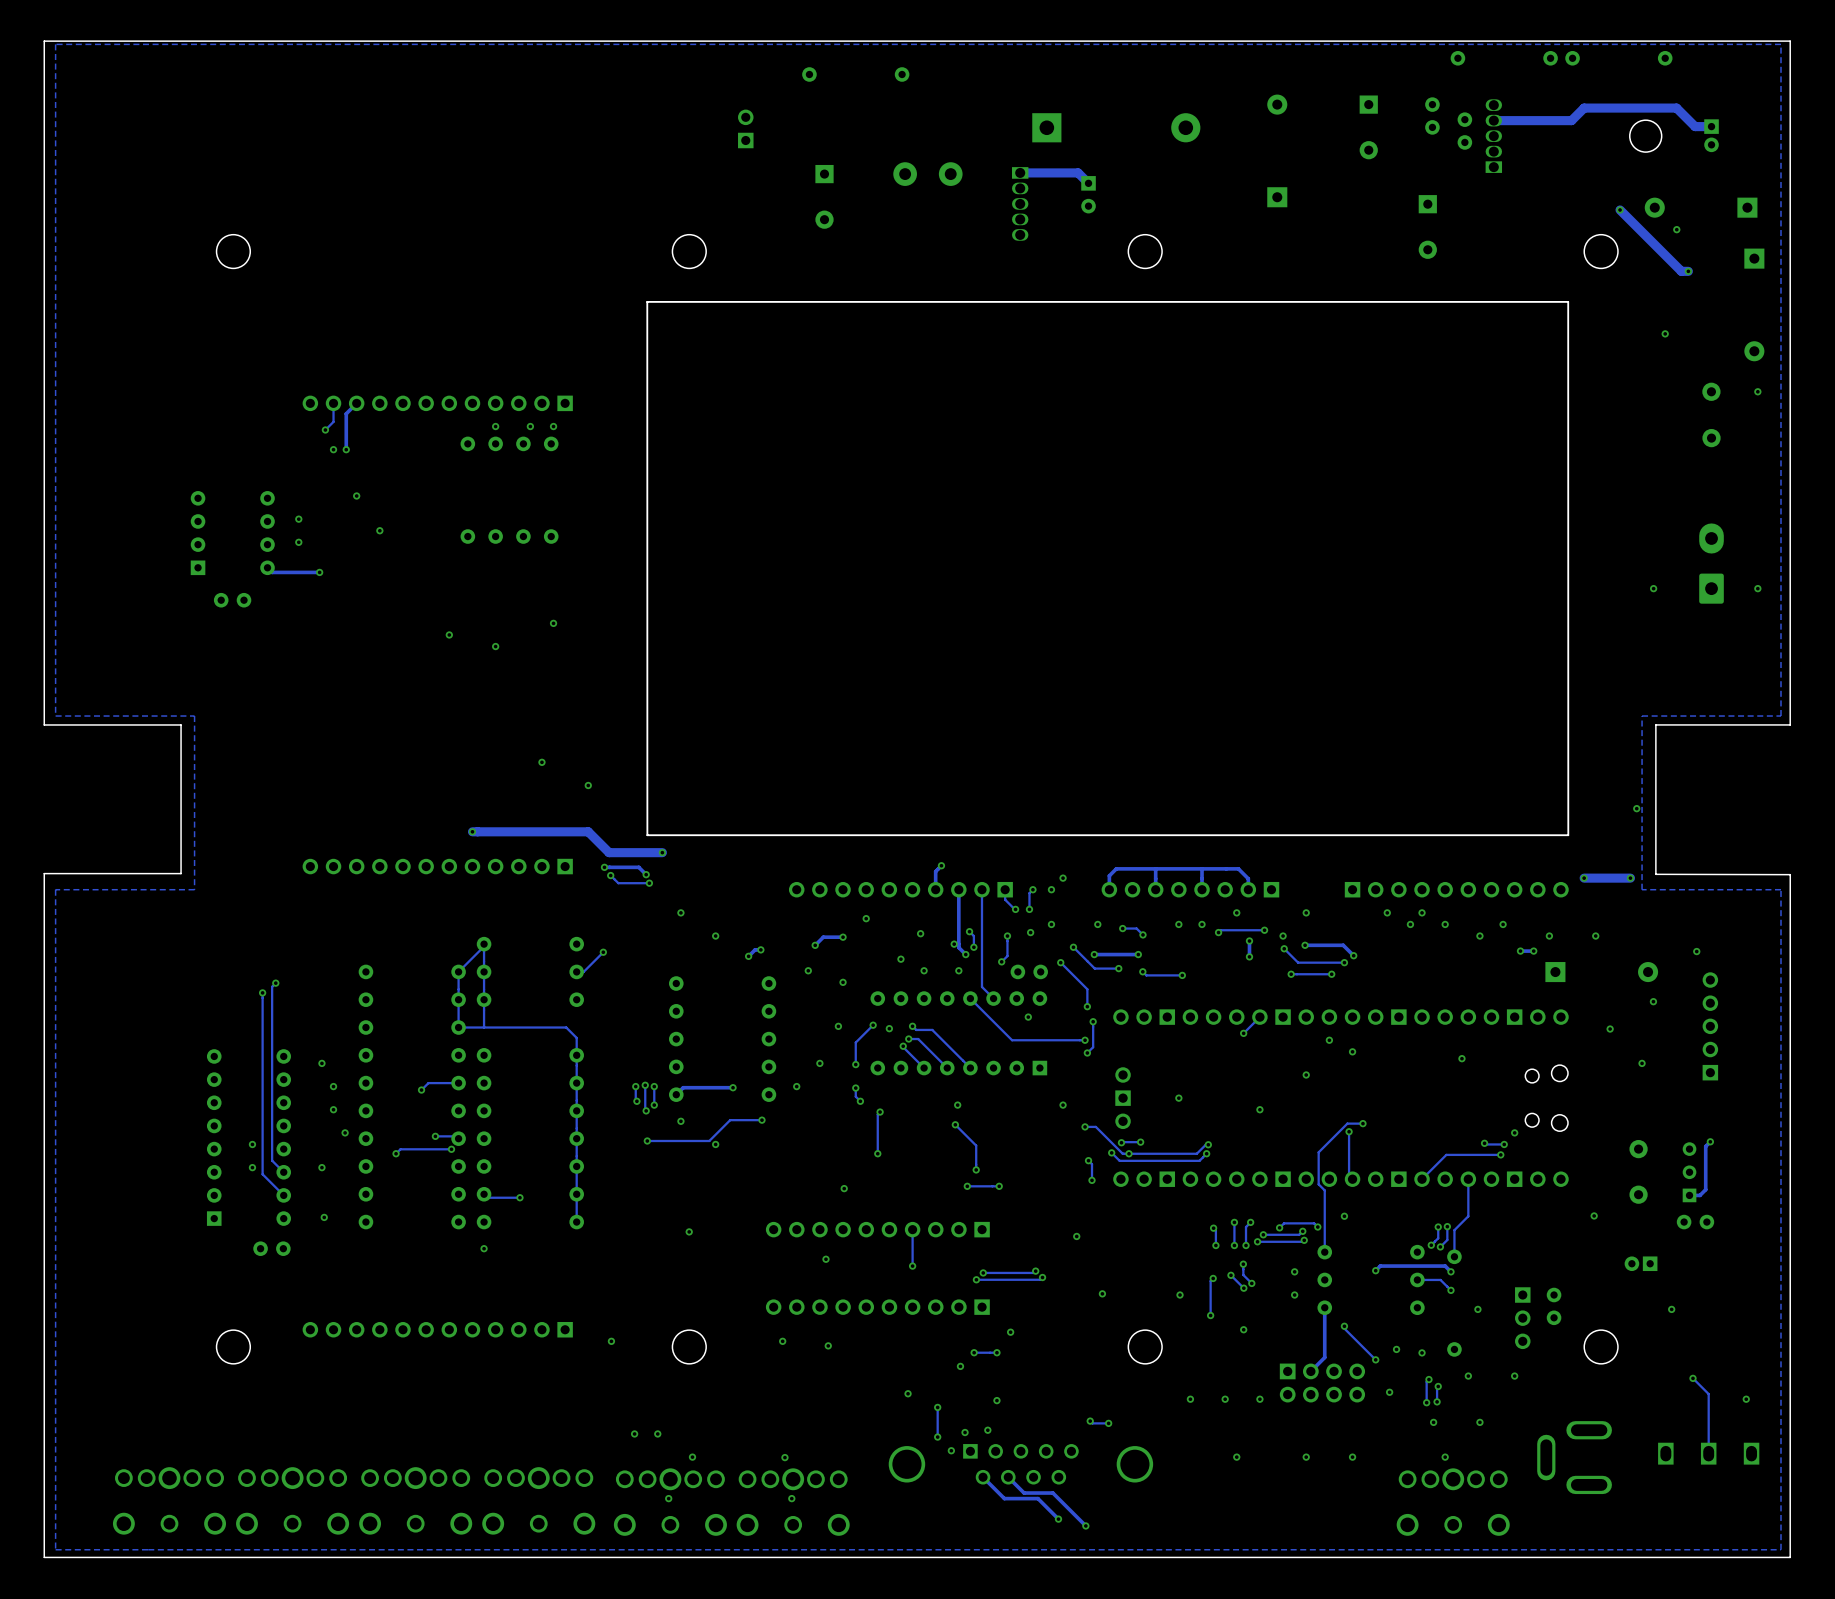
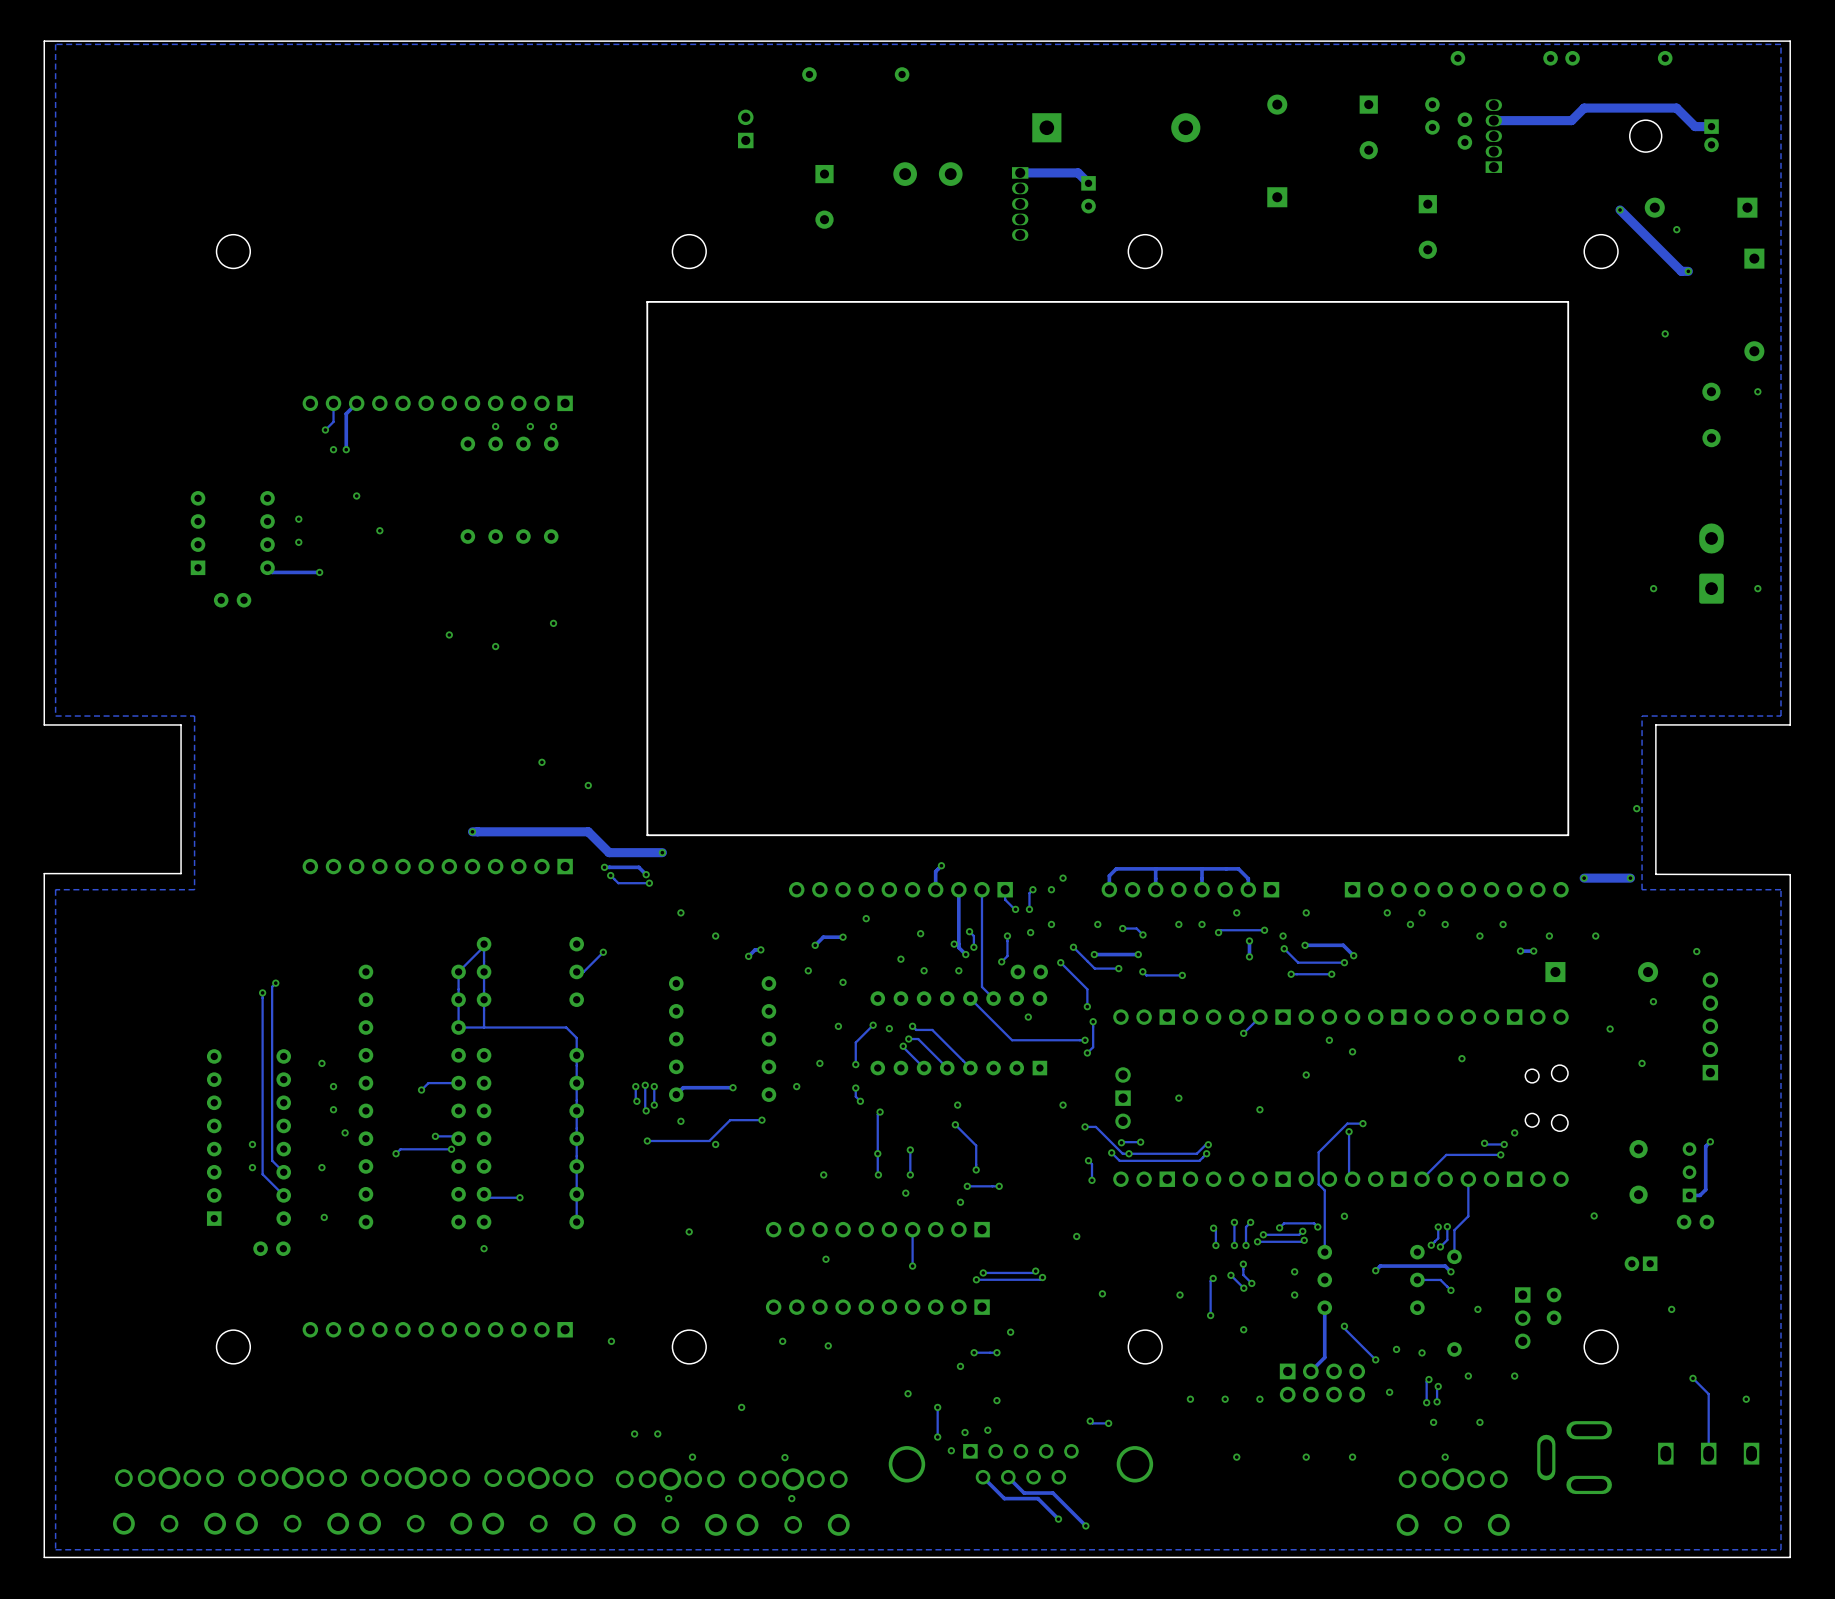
track: none -> (910, 1149) (910, 1174)
via: none -> (910, 1149)
track: none -> (877, 1153) (878, 1174)
via: none -> (823, 1174)
via: none -> (878, 1174)
via: none -> (910, 1174)
via: (844, 1188) -> none
via: none -> (905, 1193)
via: none -> (960, 1202)
via: none -> (741, 1407)

